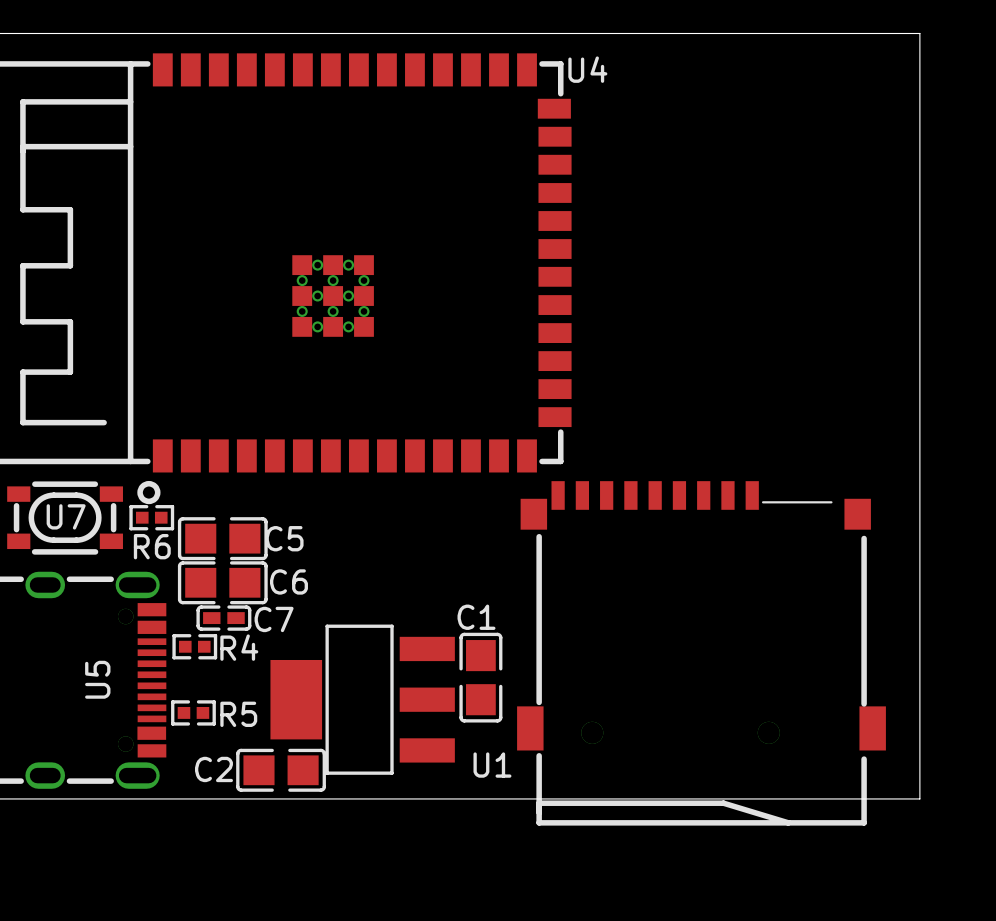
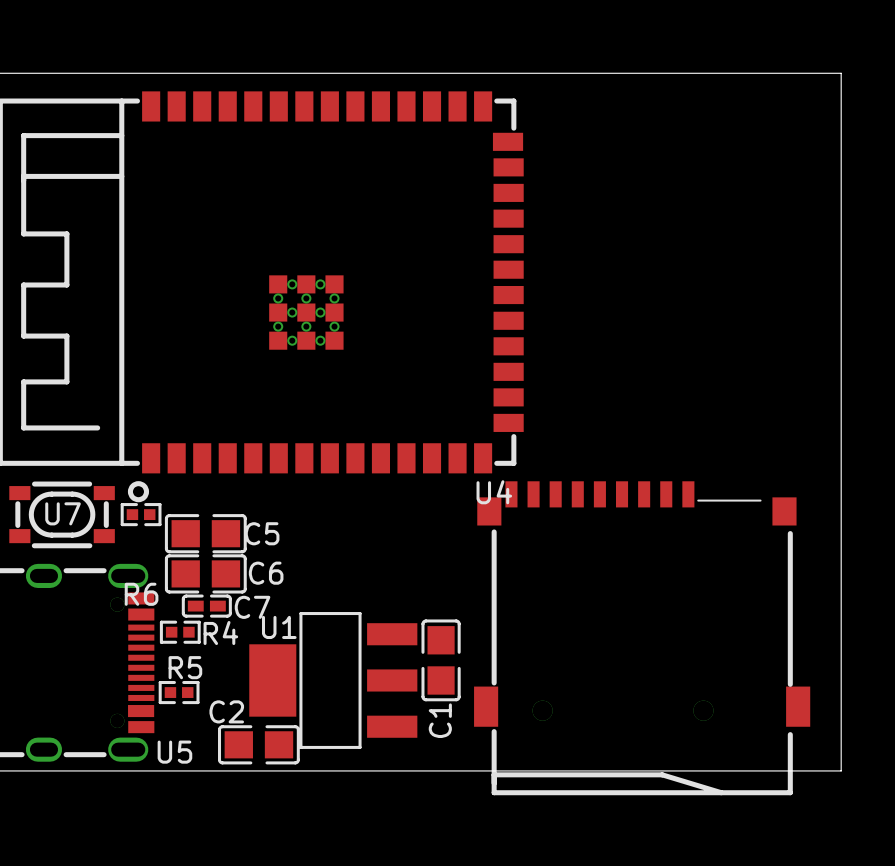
U4 name position: U4 (587, 69) -> U4 (494, 492)
R6 name position: R6 (152, 546) -> R6 (141, 594)
C1 name rotation: 0° (476, 617) -> 90° counterclockwise (440, 720)
C1 name position: C1 (476, 617) -> C1 (440, 720)
U5 name rotation: 0° (97, 679) -> 90° clockwise (174, 752)
U5 name position: U5 (97, 679) -> U5 (174, 752)
R5 name position: R5 (238, 714) -> R5 (185, 667)
U1 name position: U1 (492, 765) -> U1 (279, 627)
C2 name position: C2 (213, 769) -> C2 (226, 711)

